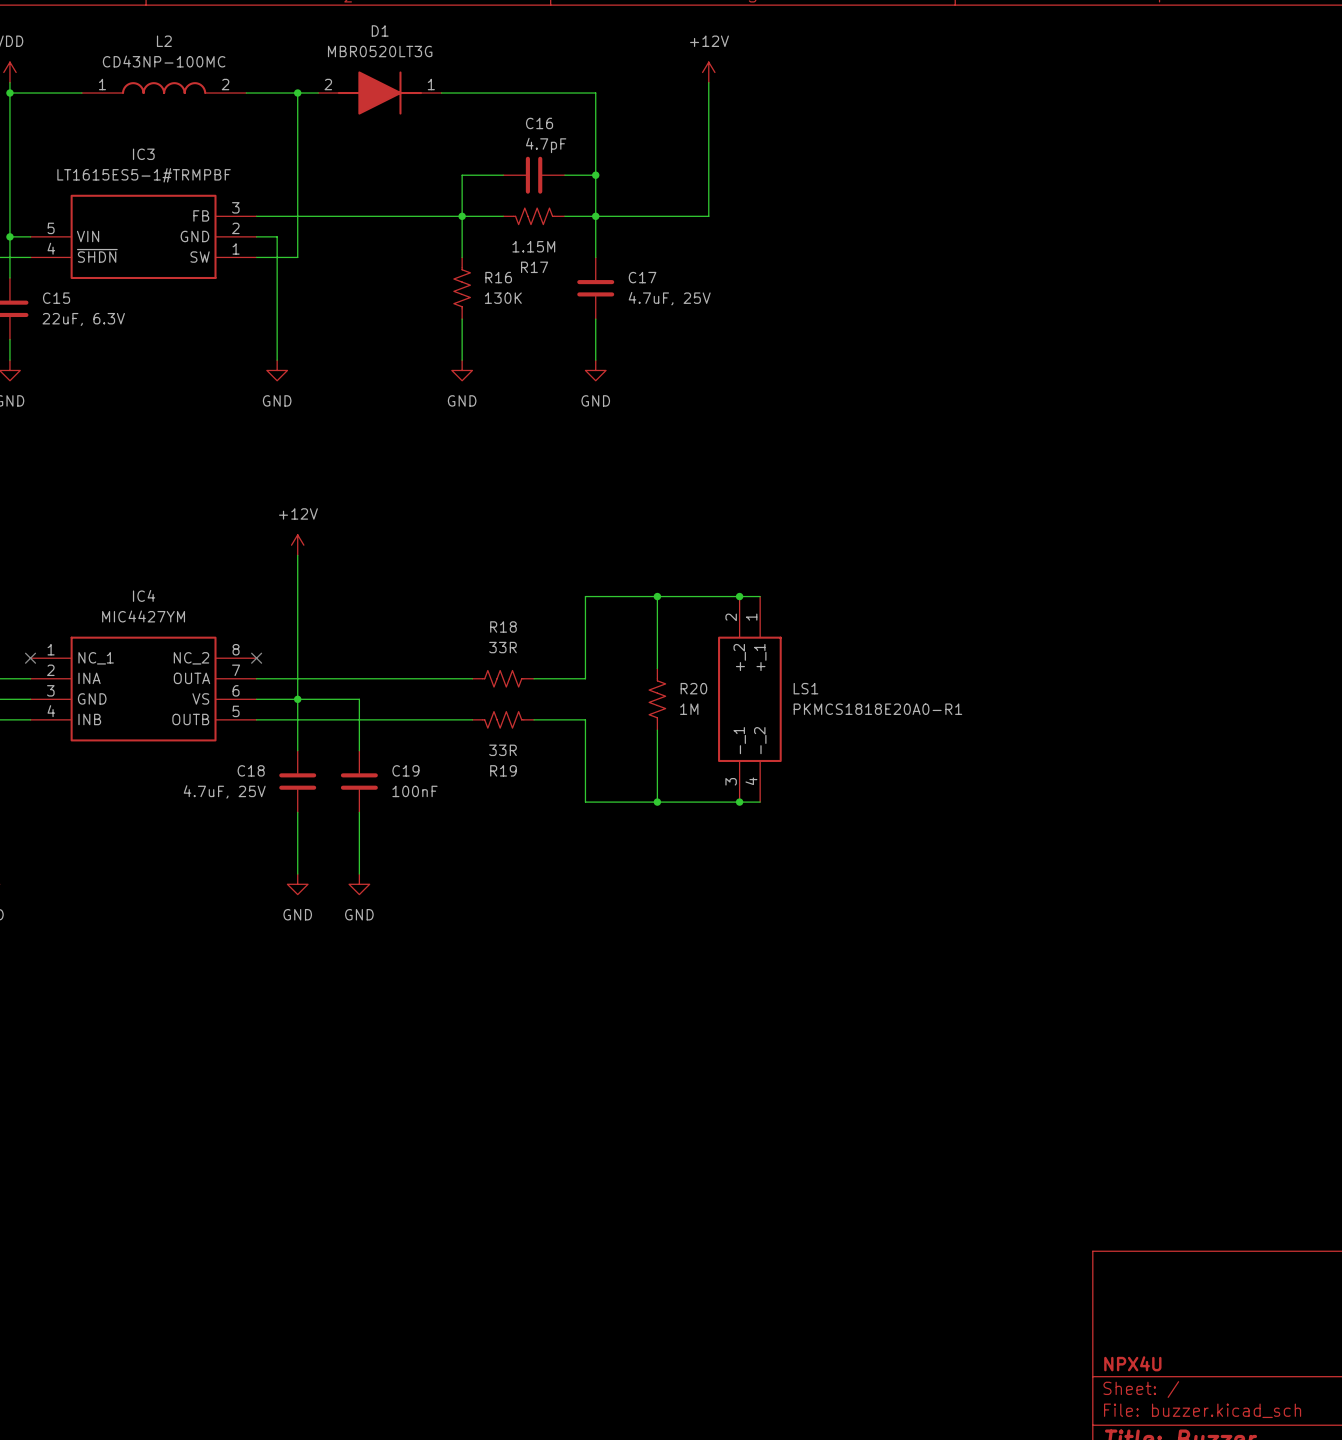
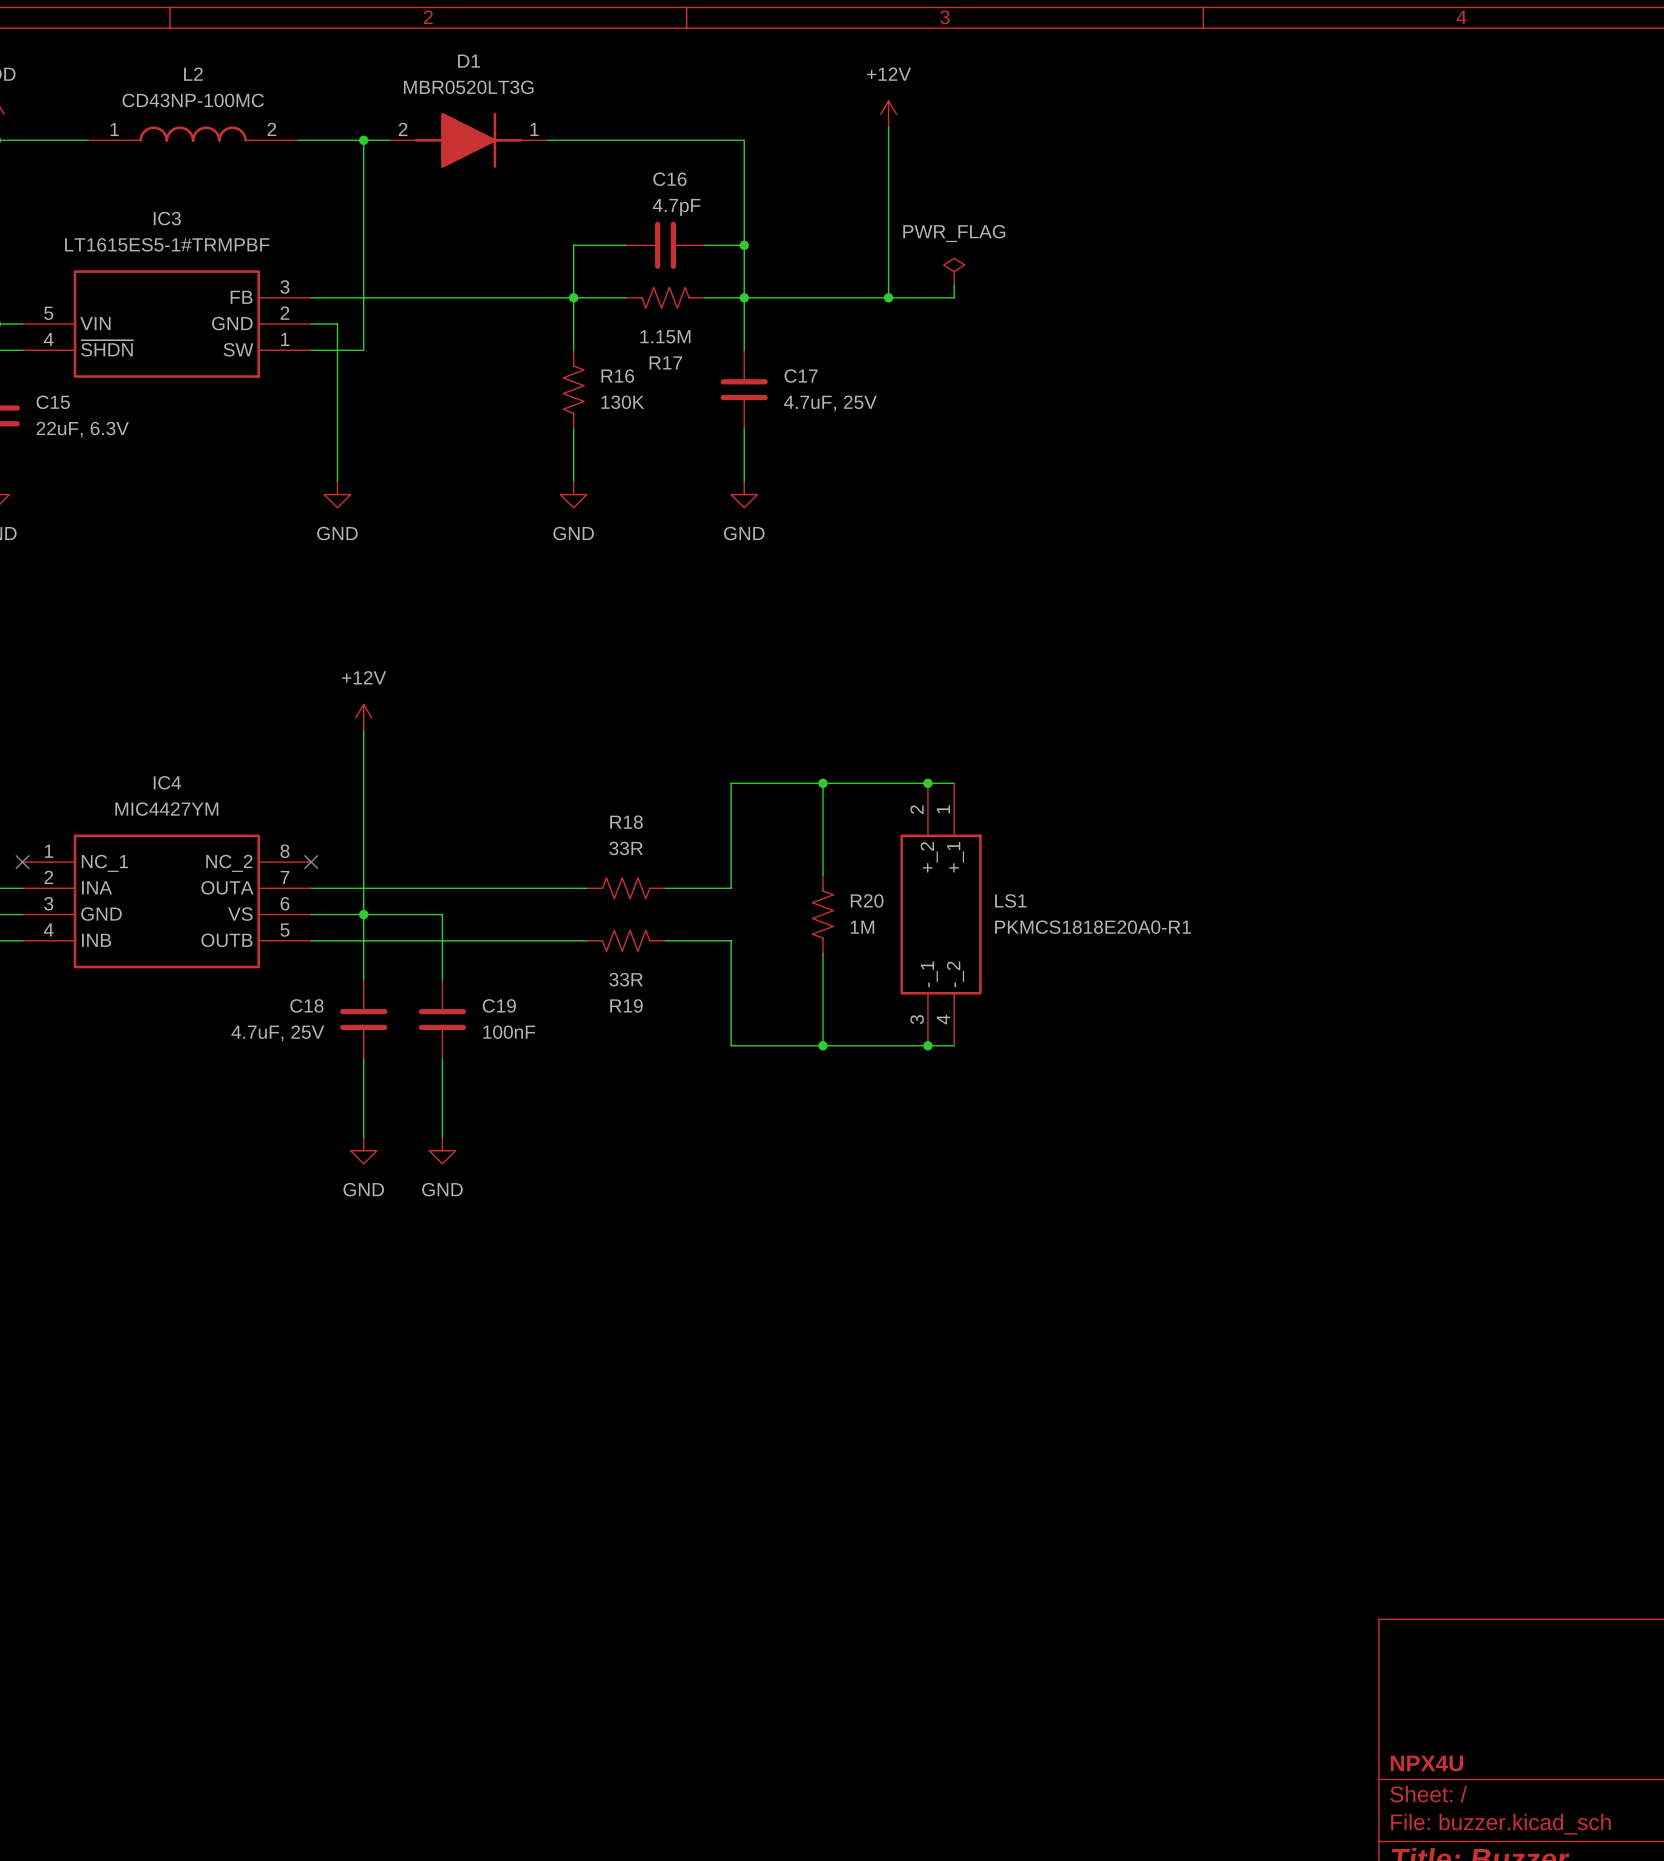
power symbol: none -> PWR_FLAG (954, 271)
wire: none -> (954, 284) (954, 297) (888, 297)
junction: none -> (888, 297)

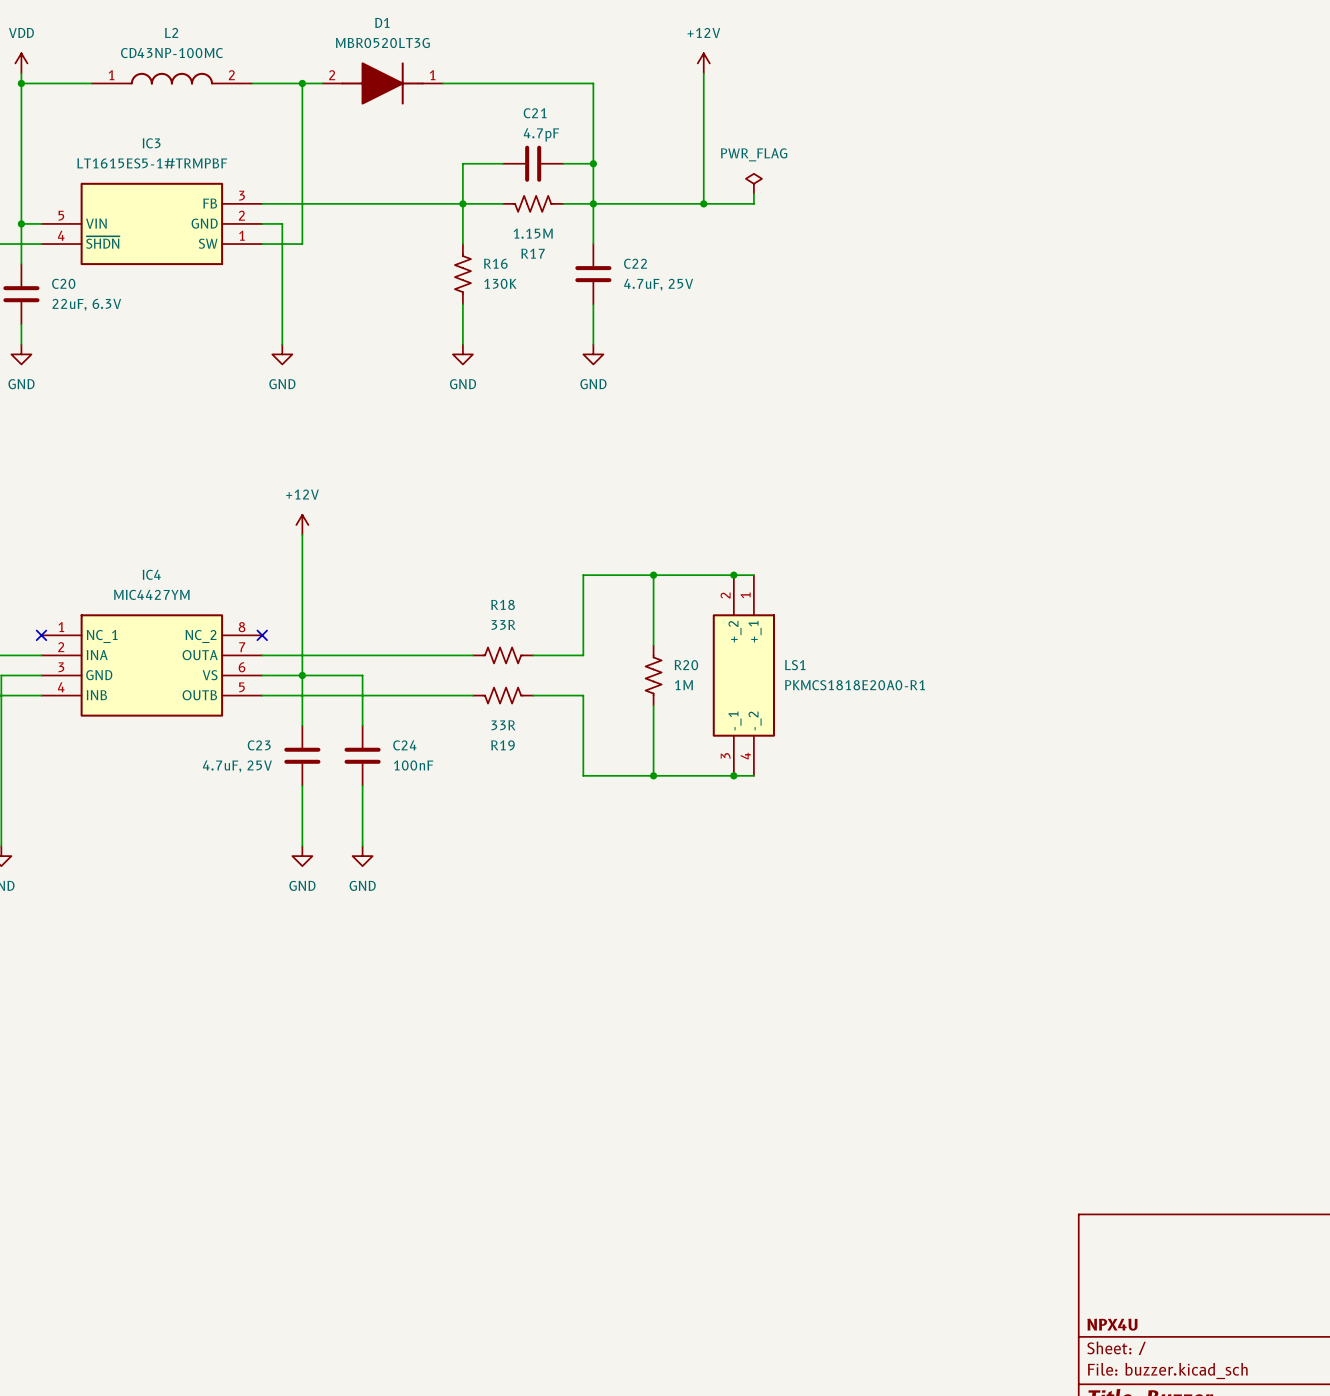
C16 name: C16 (669, 179) -> C21 (535, 113)
C17 name: C17 (801, 376) -> C22 (635, 263)
C15 name: C15 (53, 402) -> C20 (63, 283)
C18 name: C18 (306, 1005) -> C23 (259, 745)
C19 name: C19 (499, 1005) -> C24 (404, 745)

